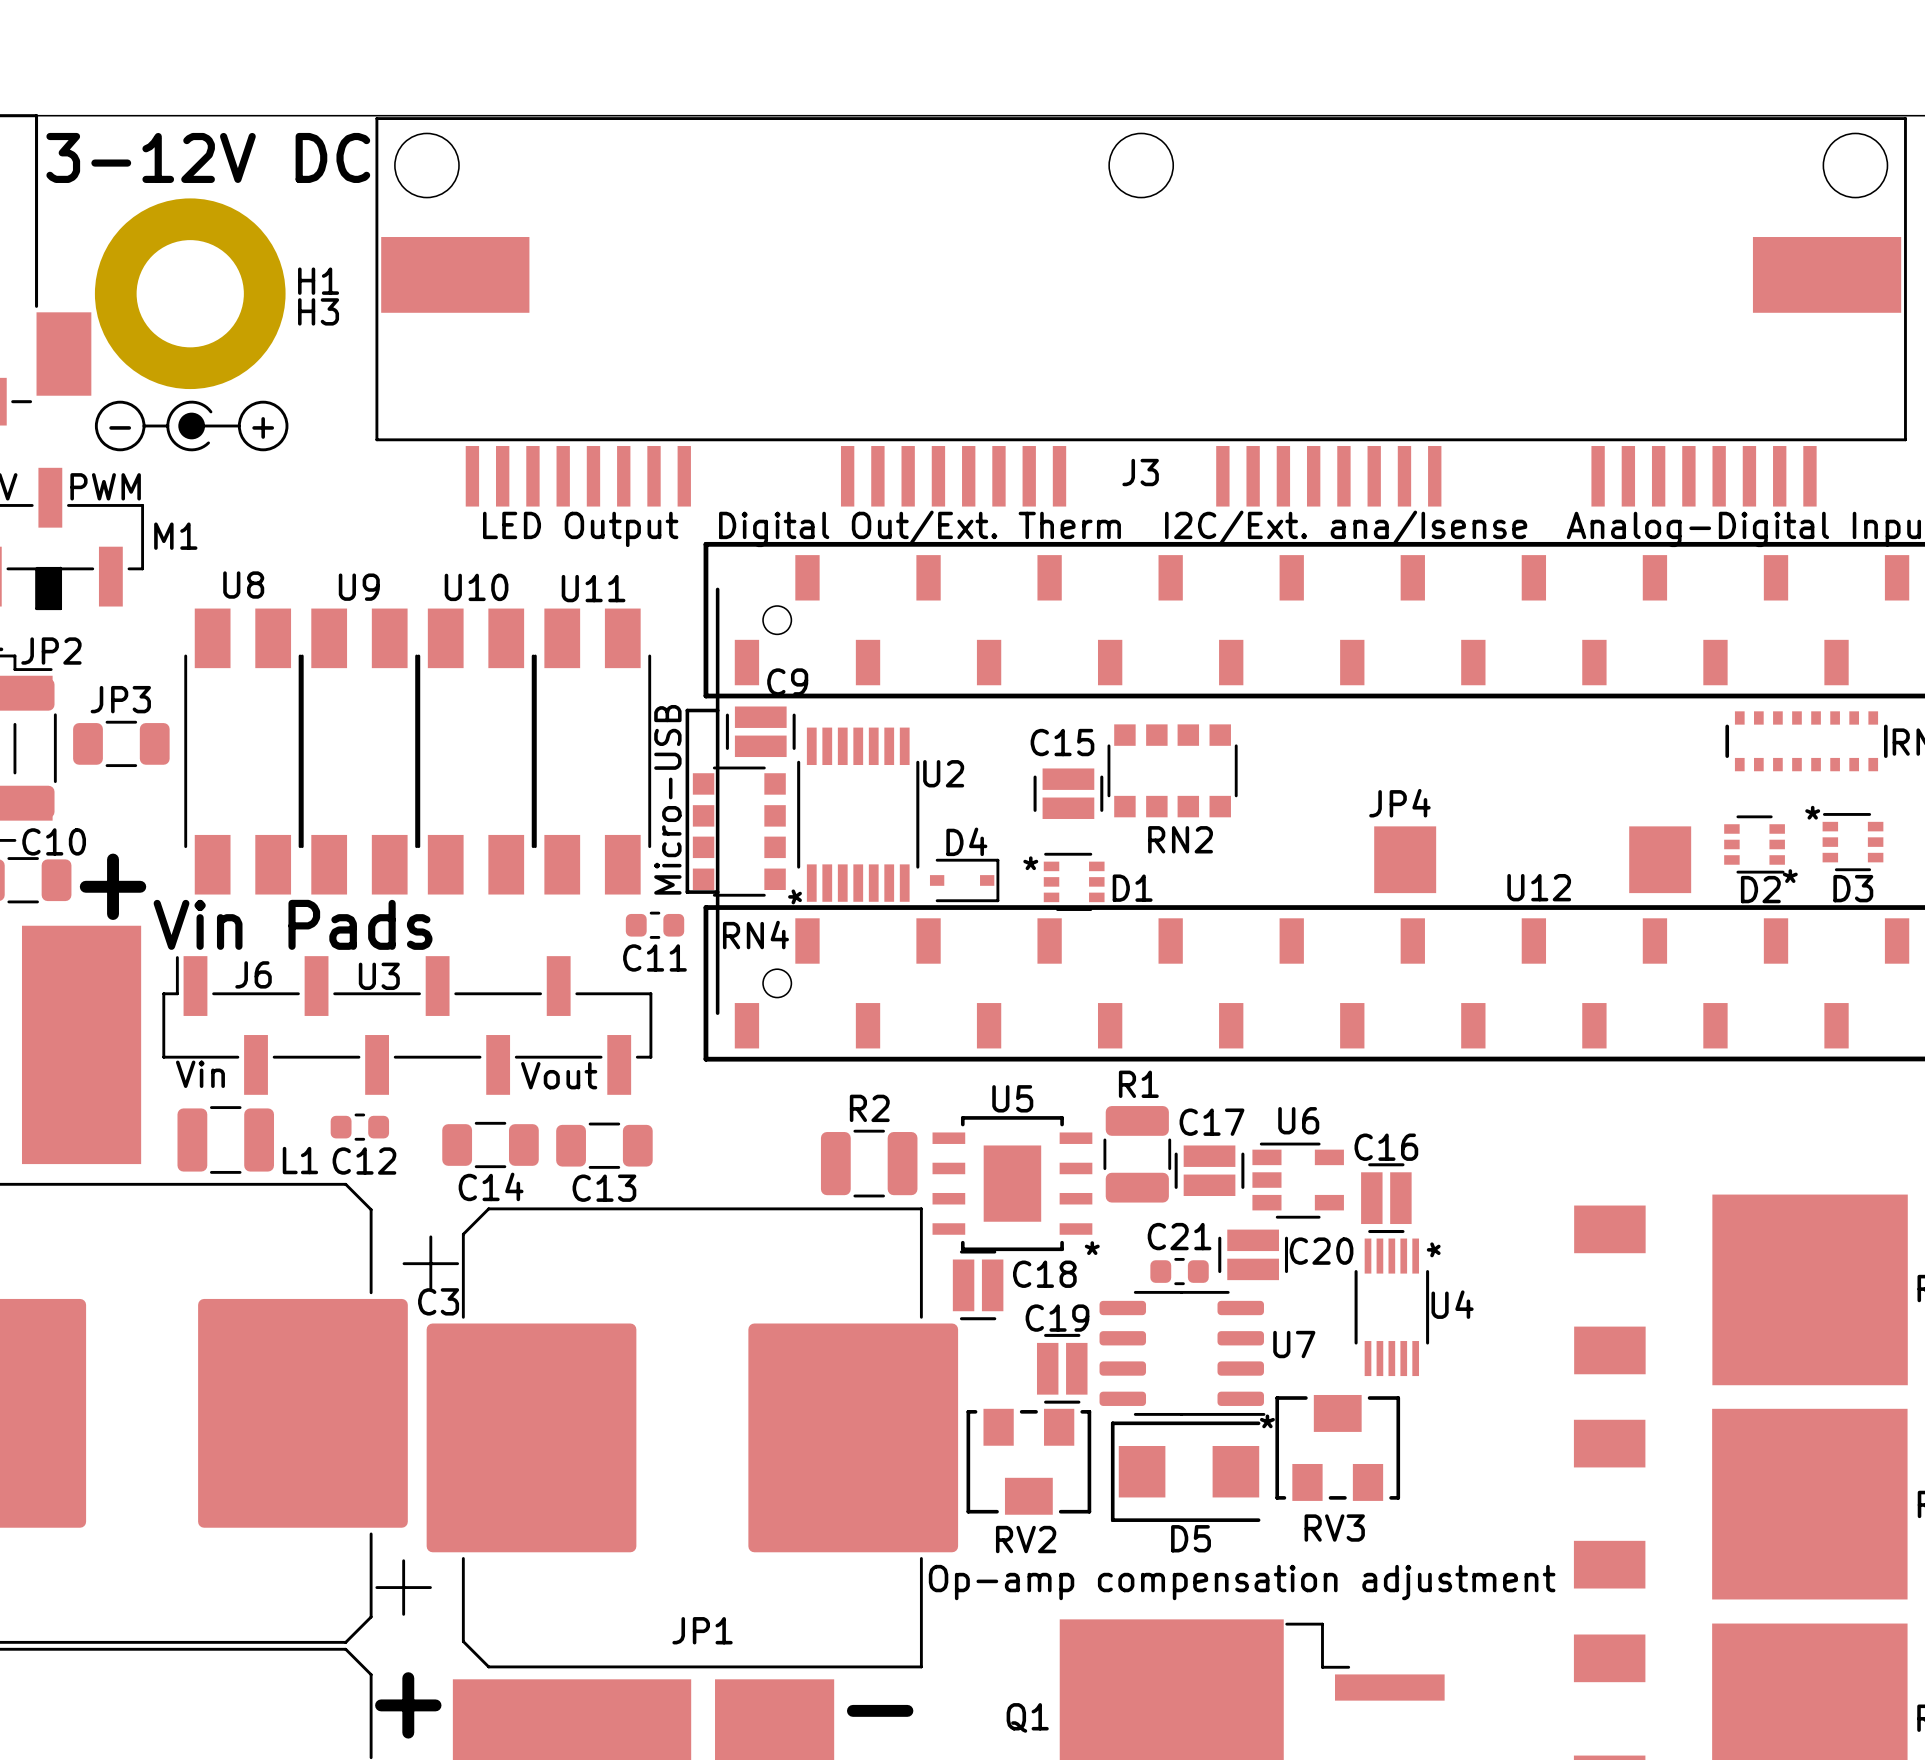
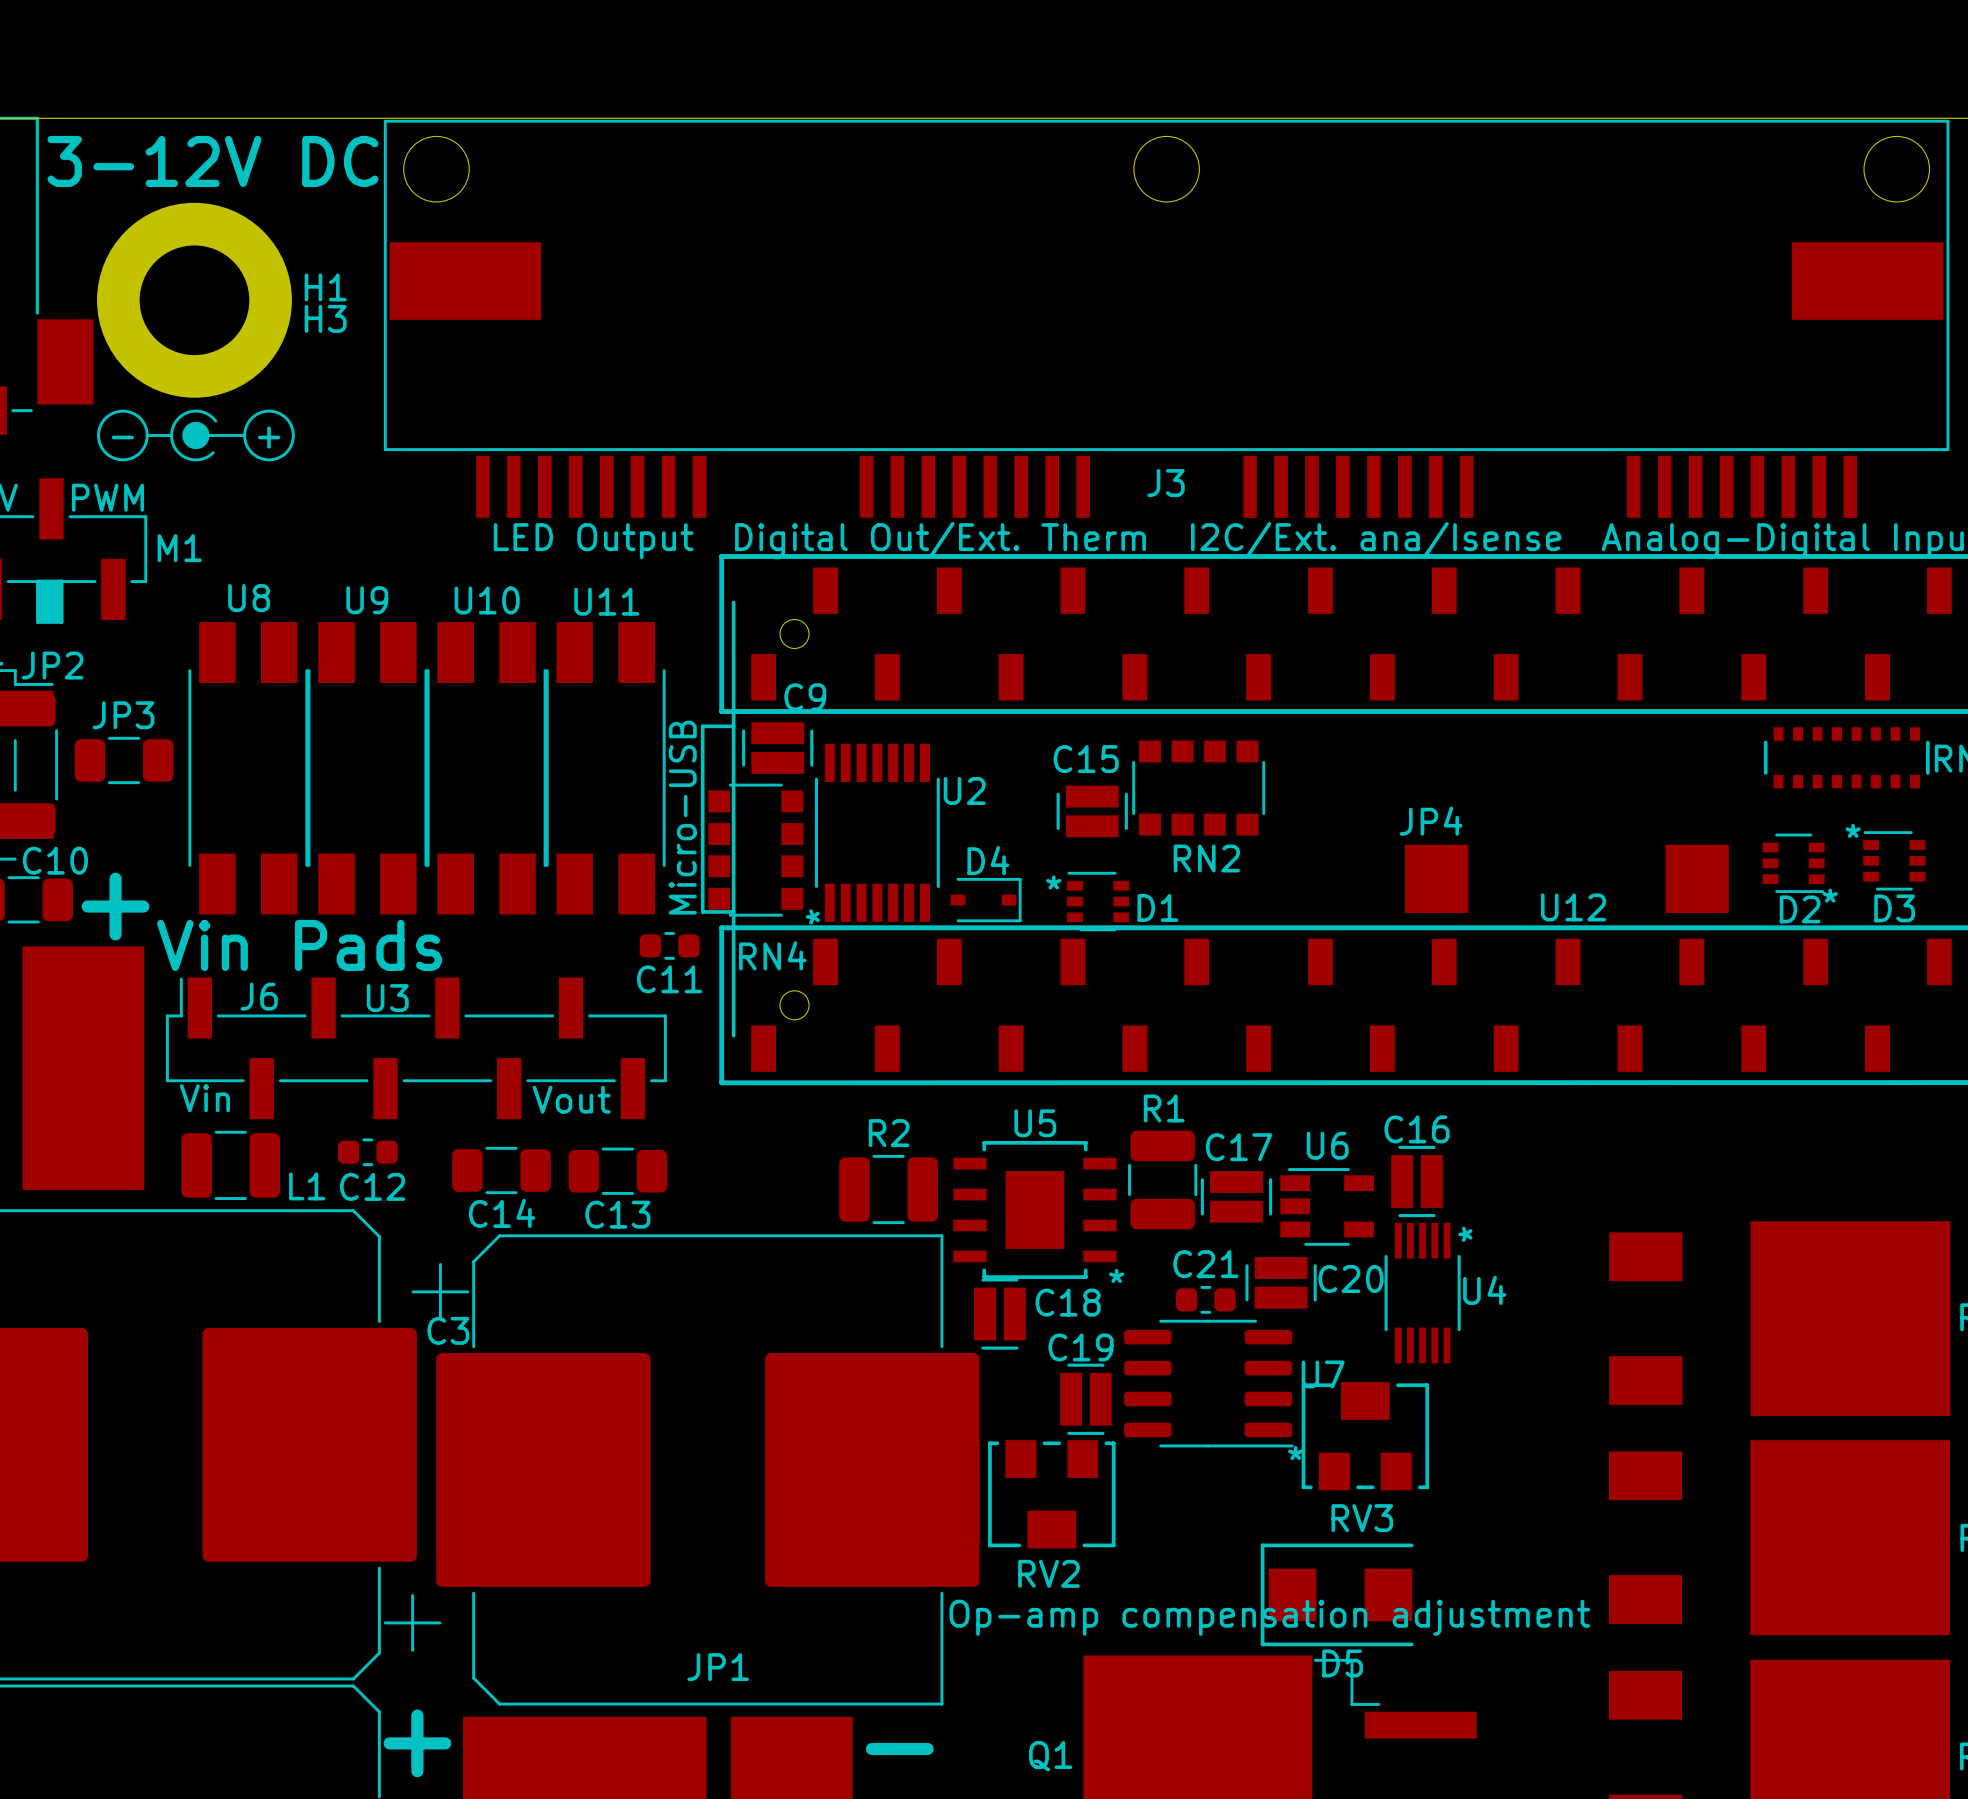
C16 position: (1386, 1198) -> (1417, 1181)
U4 position: (1391, 1307) -> (1422, 1293)
RV3 position: (1337, 1447) -> (1365, 1436)
D5 position: (1185, 1471) -> (1337, 1594)

